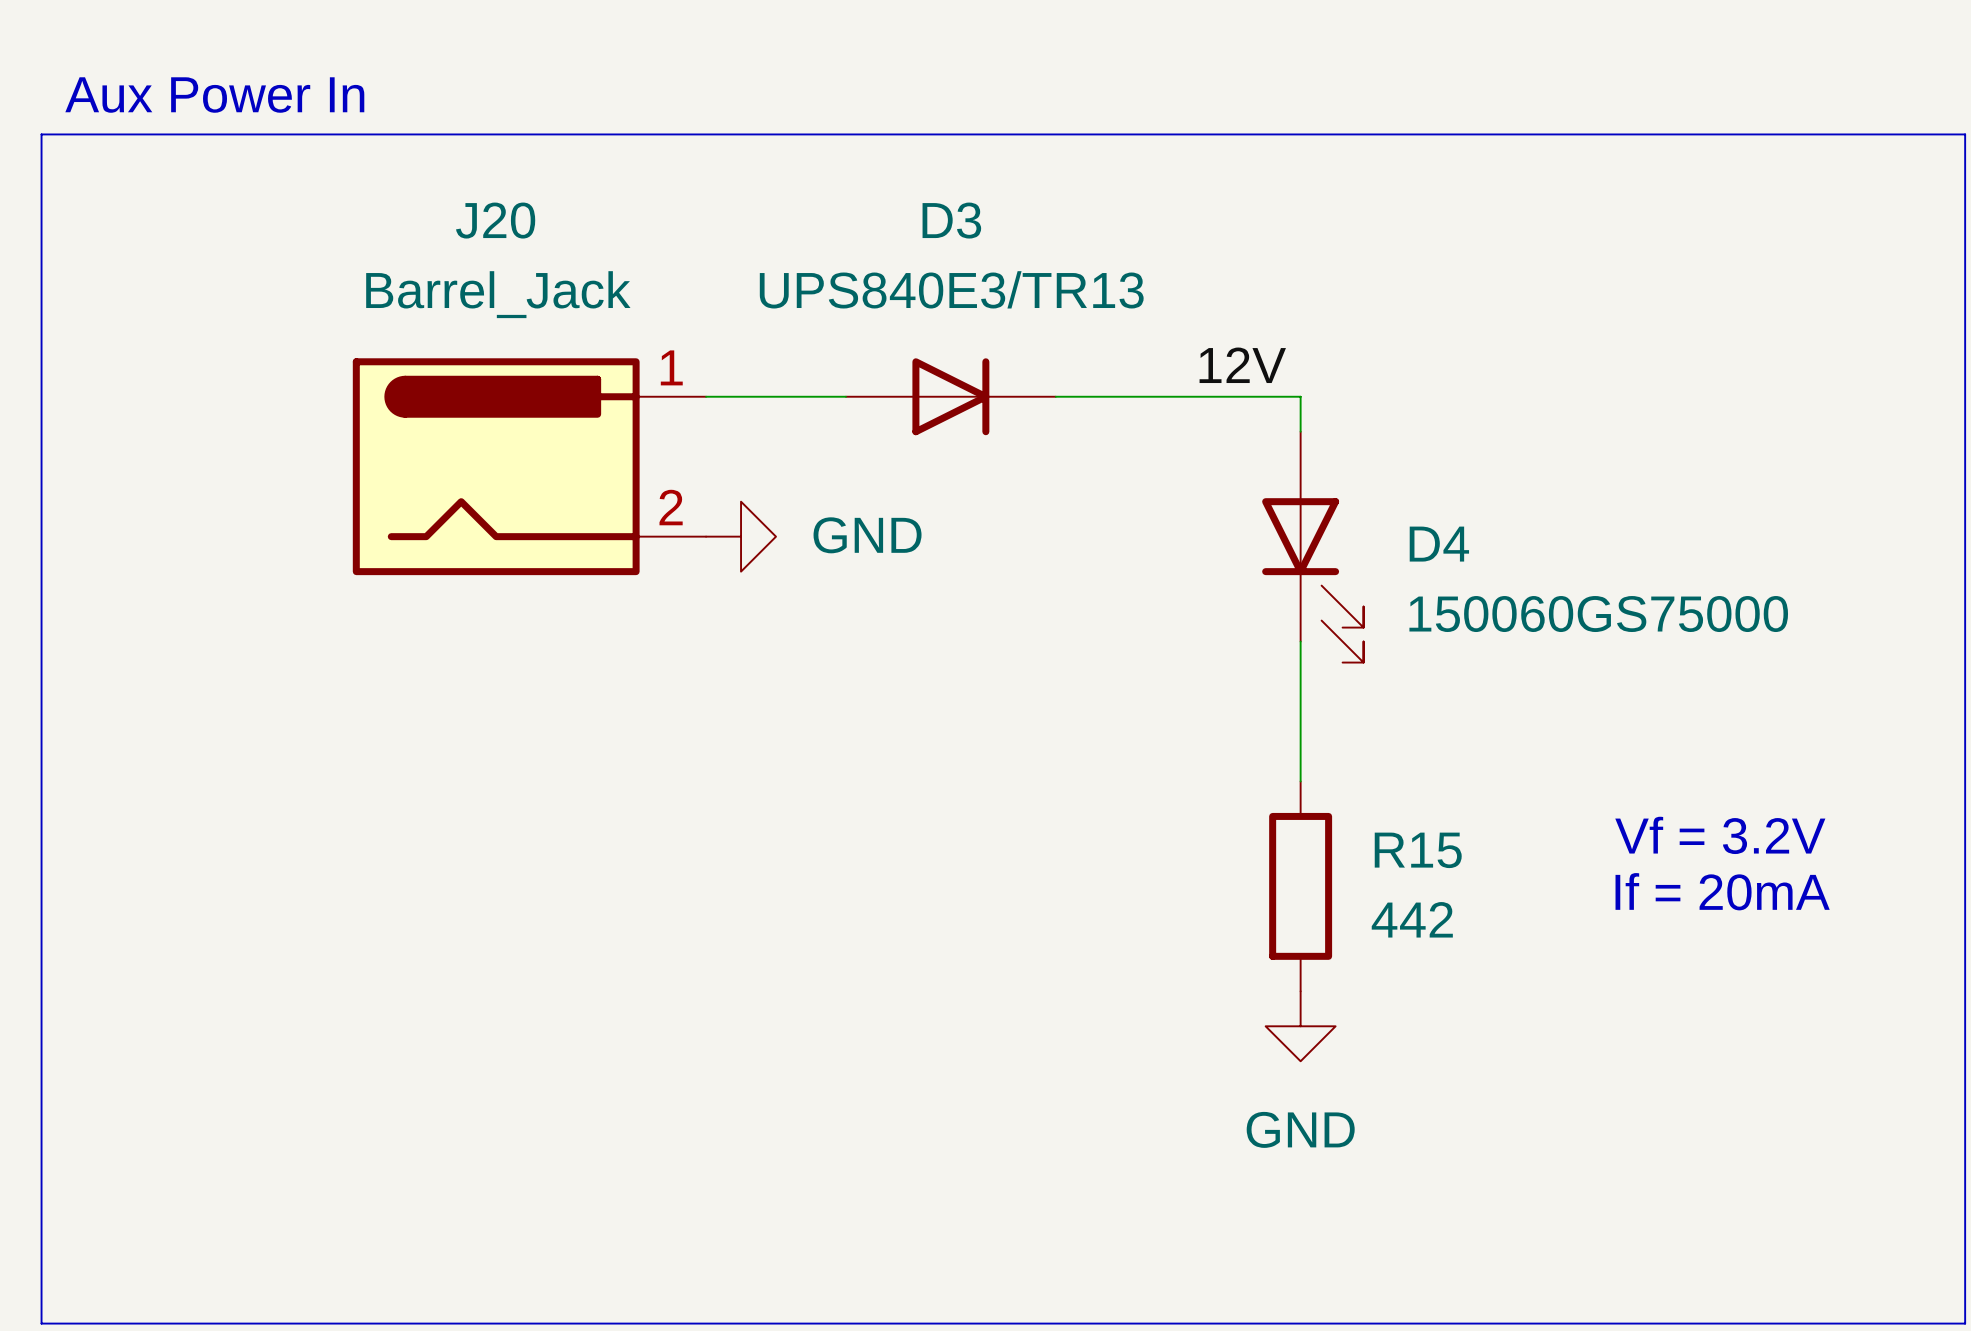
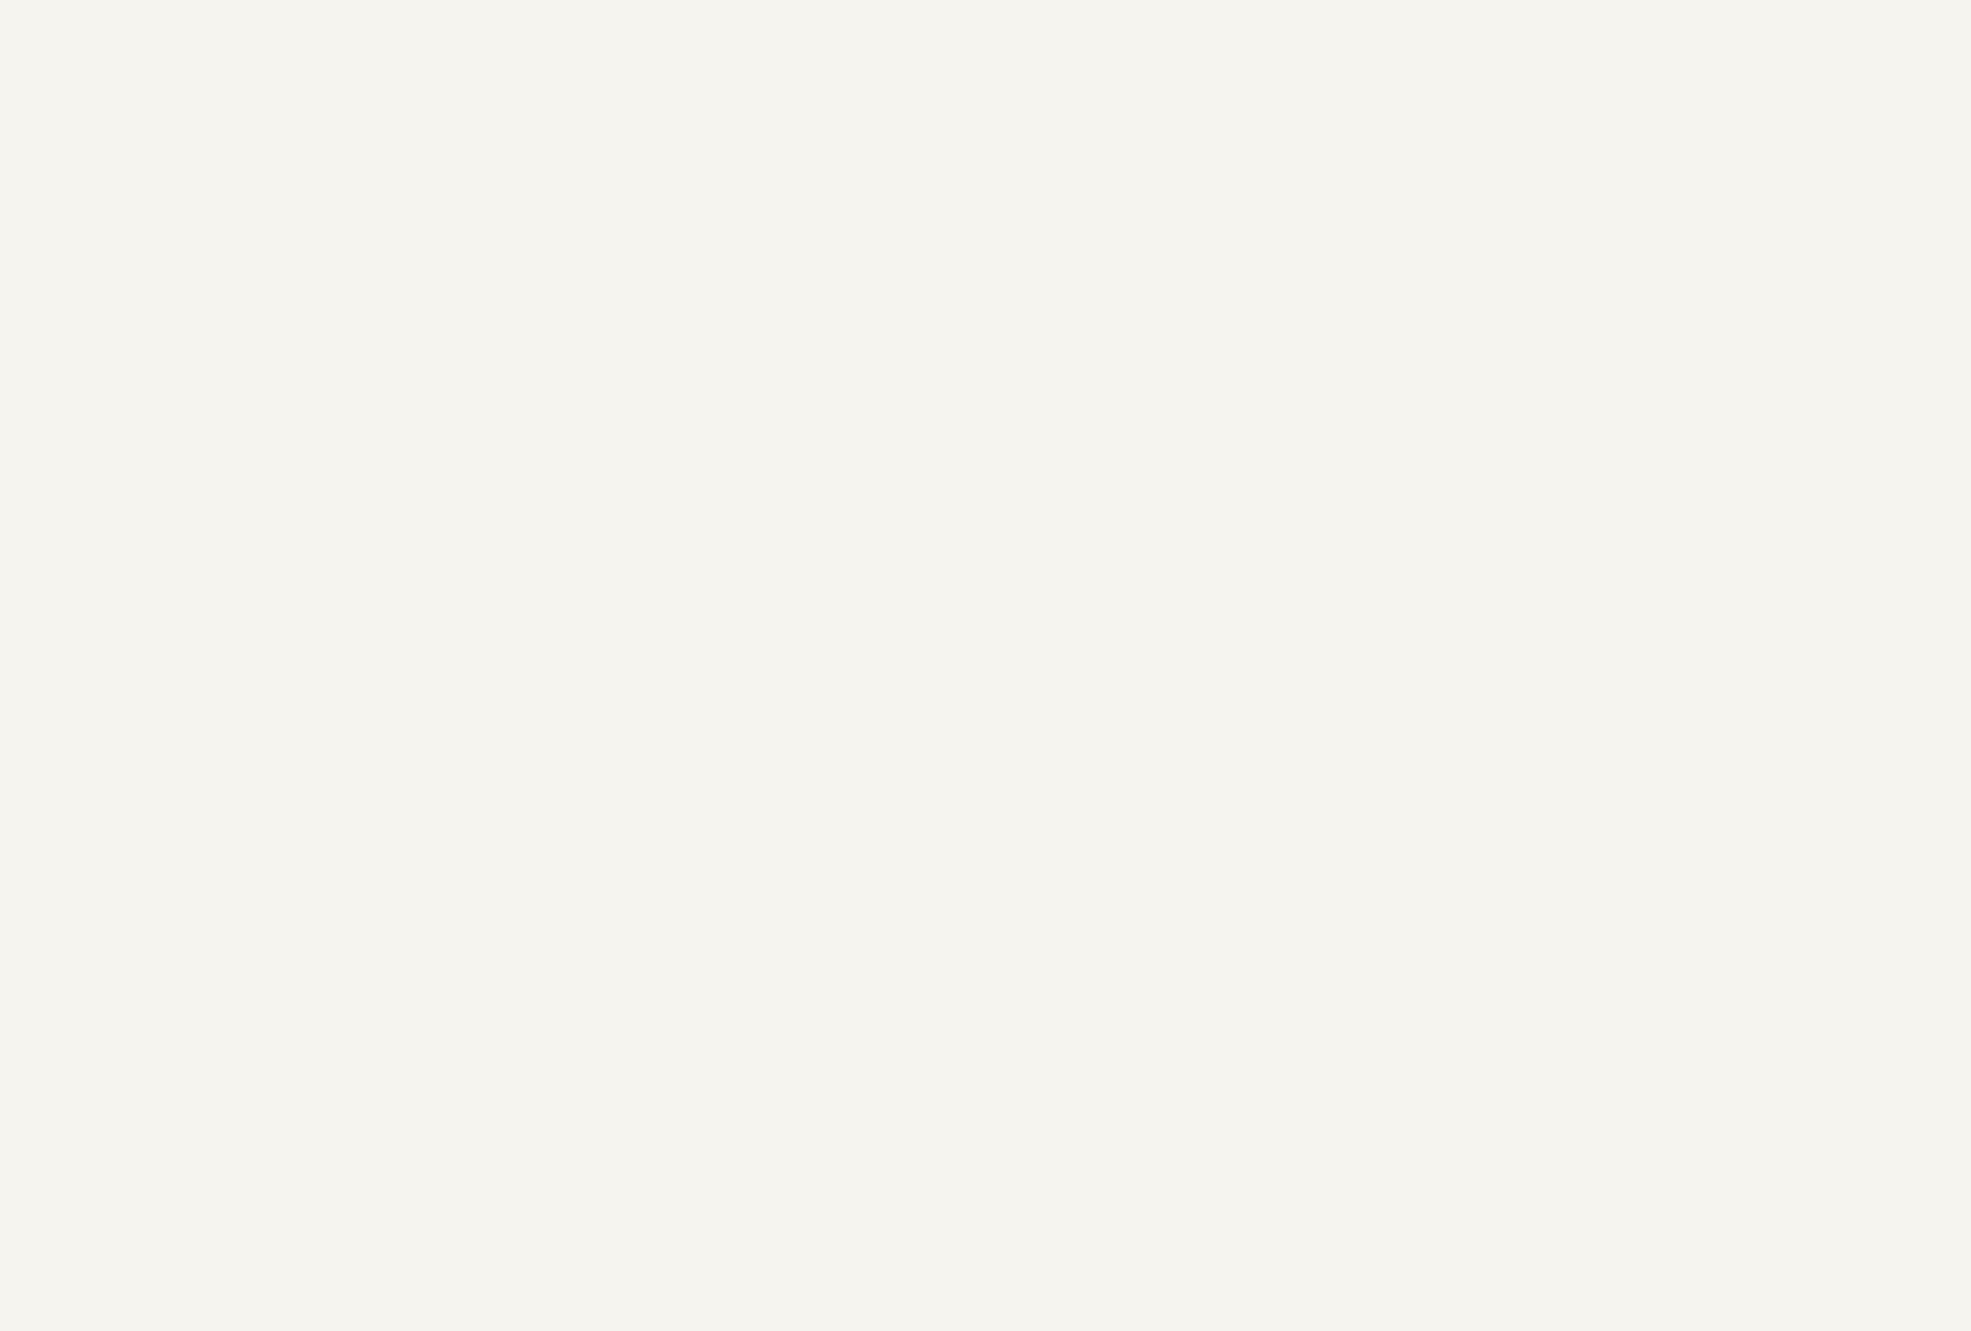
text: Aux Power In (214, 95) -> none
line: (41, 134) (1965, 134) (1965, 1323) (41, 1323) (41, 134) -> none
label: 12V (1242, 365) -> none
wire: (706, 396) (845, 396) -> none
D3: UPS840E3/TR13 (950, 396) -> none
wire: (1055, 396) (1300, 396) (1300, 431) -> none
J20: Barrel_Jack (529, 466) -> none
power symbol: GND (741, 536) -> none
D4: 150060GS75000 (1312, 547) -> none
wire: (1300, 641) (1300, 781) -> none
text: Vf = 3.2V (1720, 835) -> none
R15: 442 (1300, 886) -> none
text: If = 20mA (1722, 891) -> none
power symbol: GND (1300, 1026) -> none

